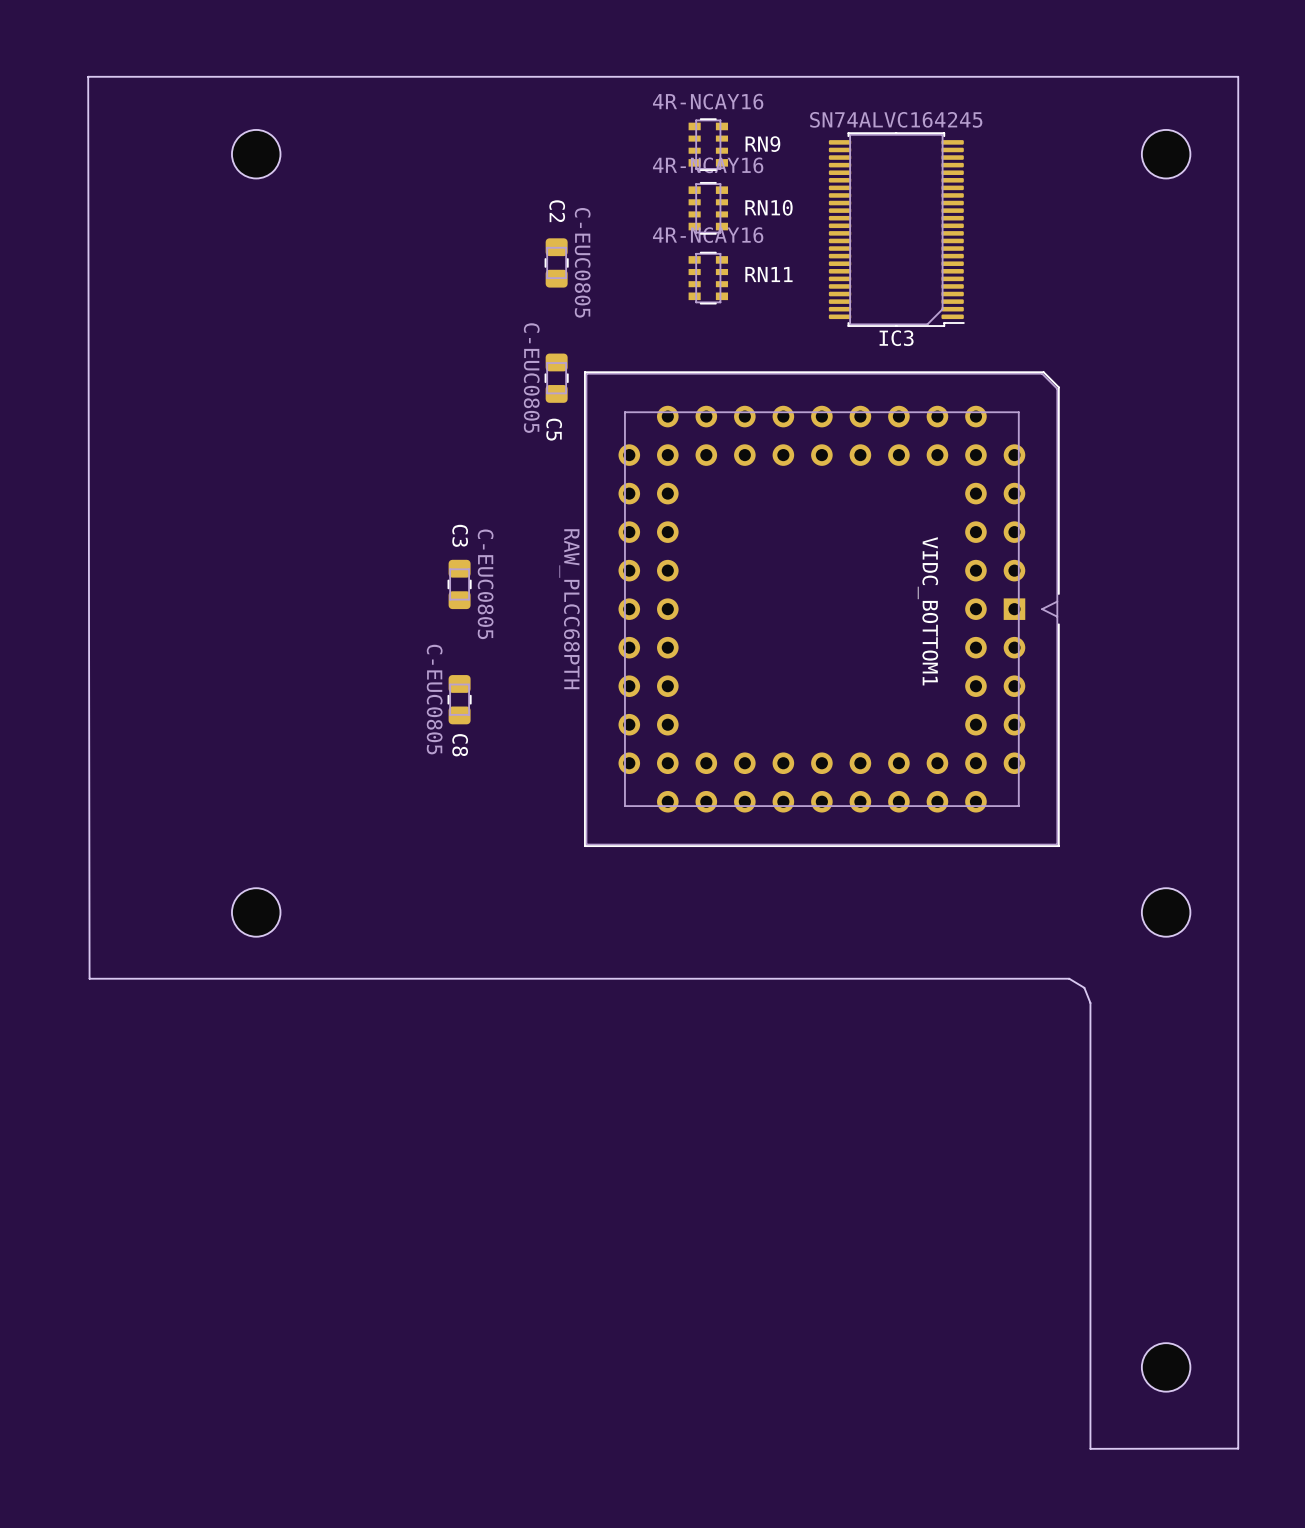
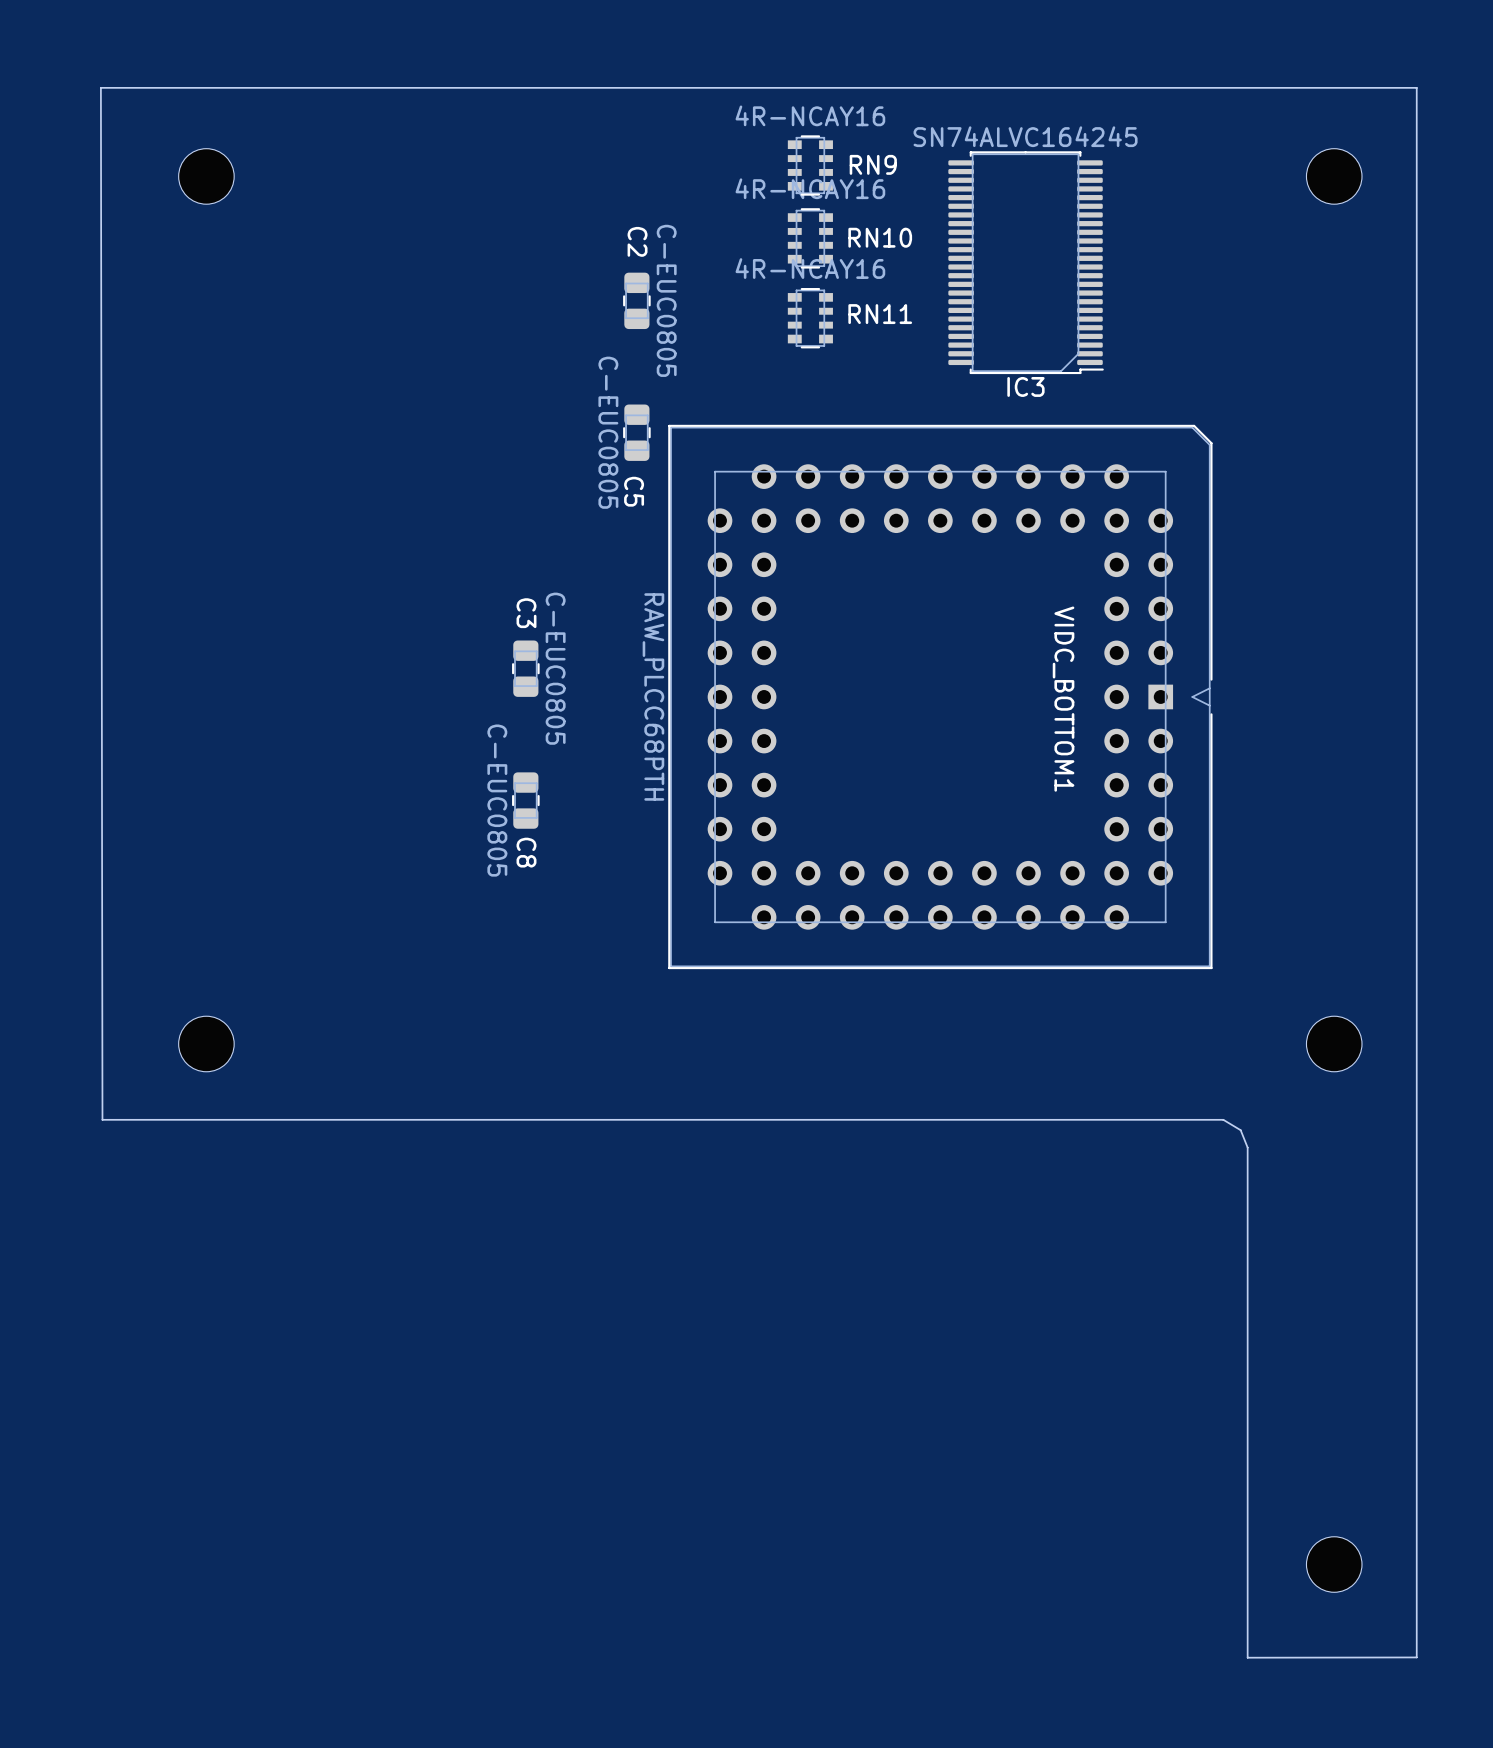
part position: (256, 154) -> (206, 176)
part position: (256, 912) -> (206, 1043)

